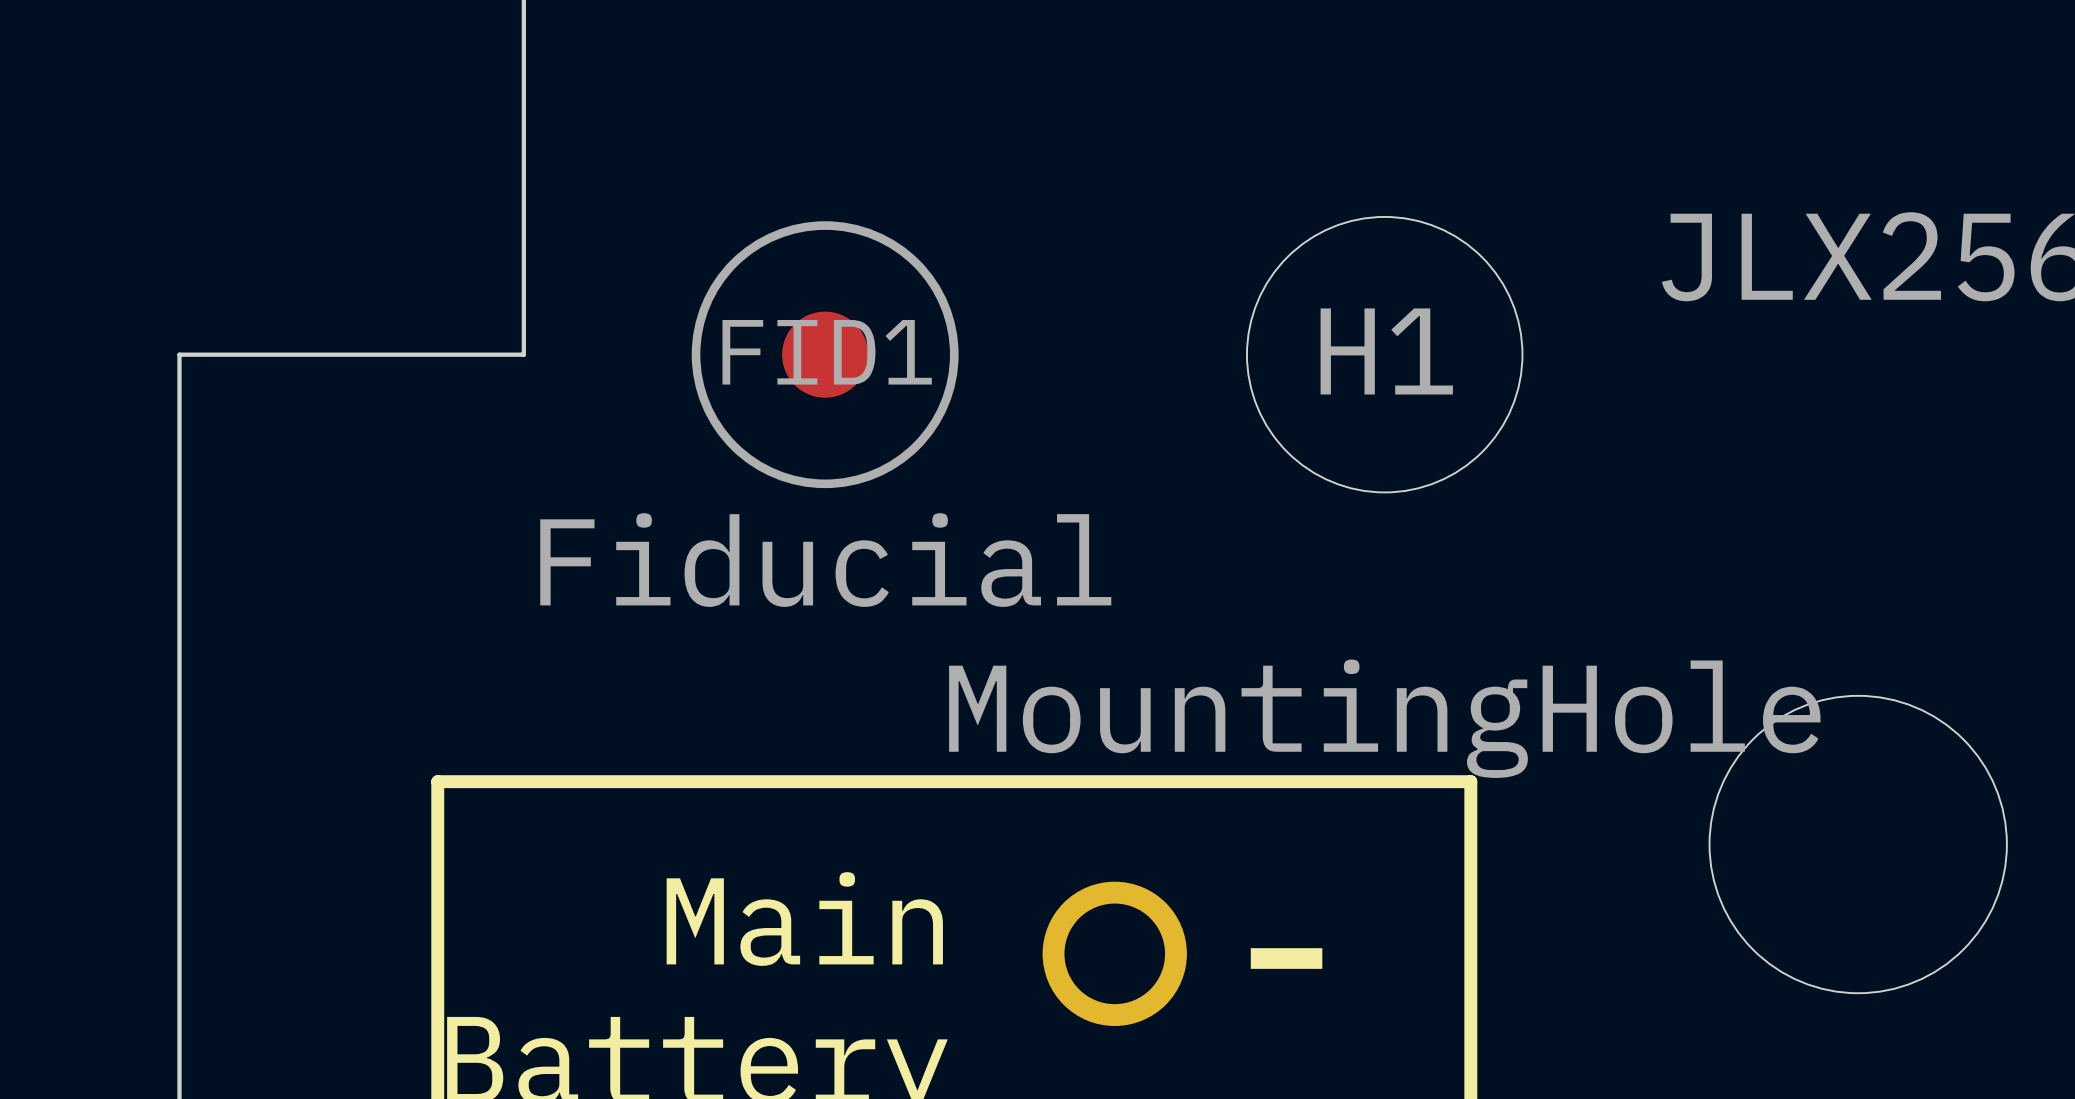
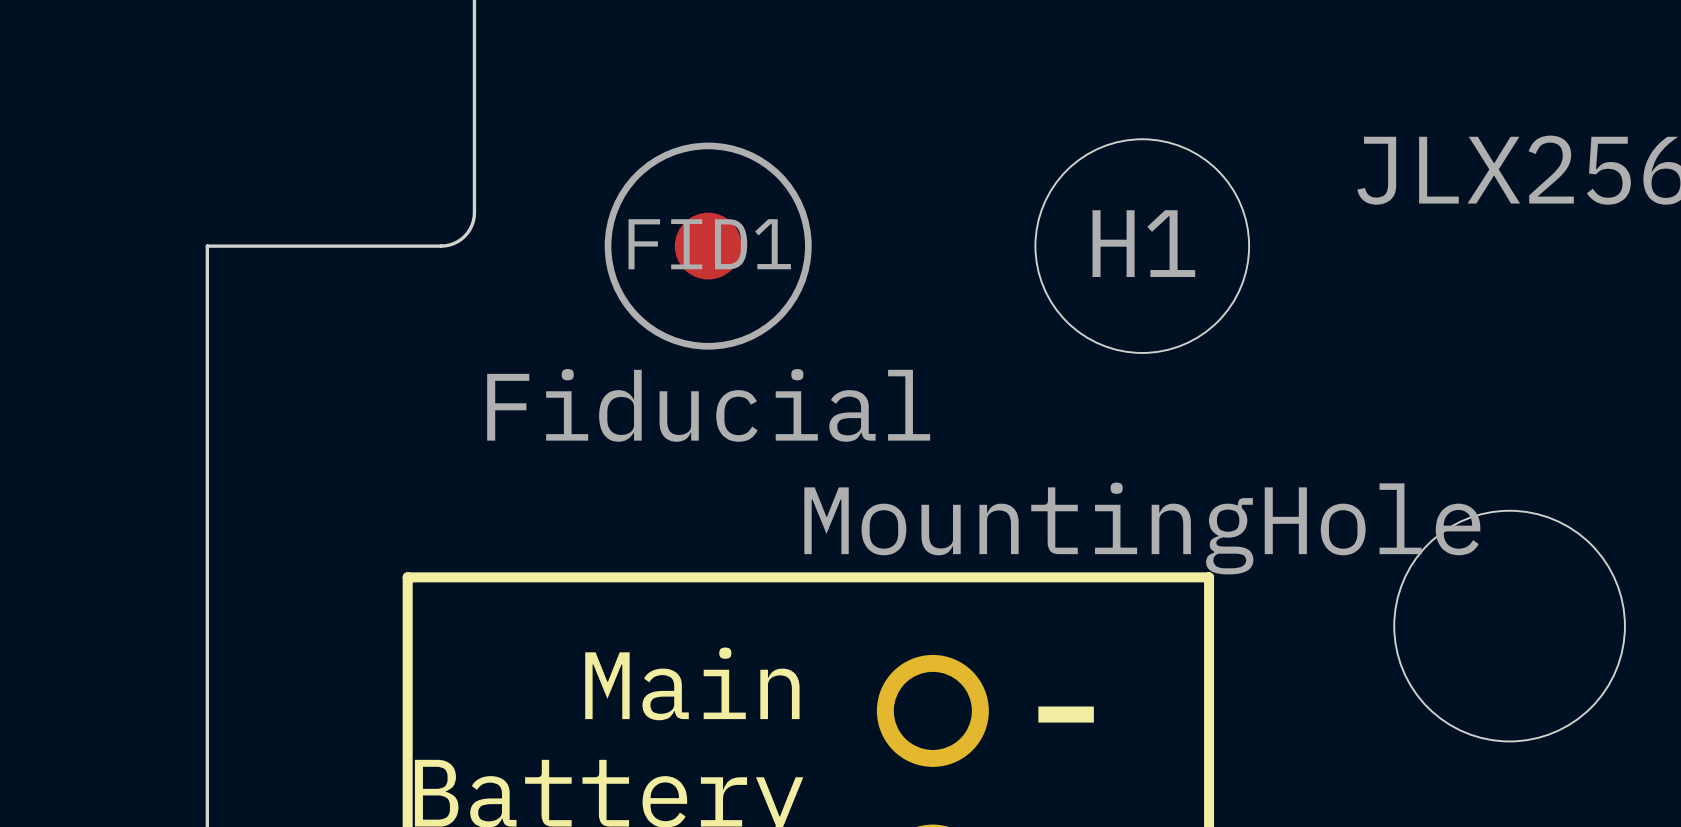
board edge: (523, 311) (523, 354) (480, 354) -> (474, 212) (471, 225) (464, 236) (453, 243) (441, 246)

